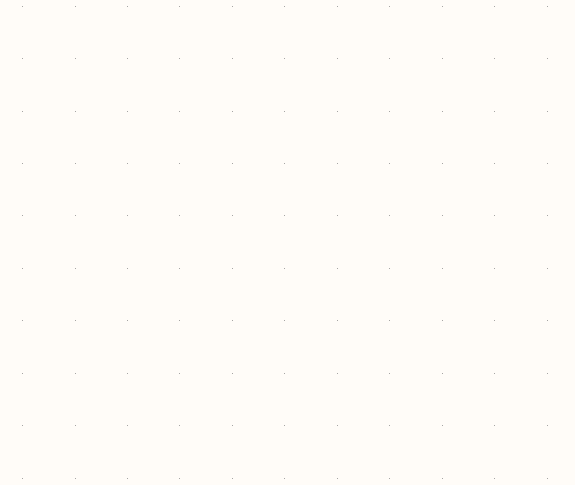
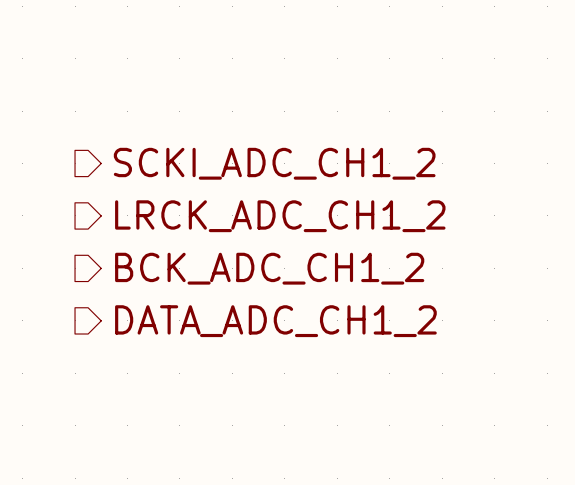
hierarchical label: none -> SCKI_ADC_CH1_2 (274, 163)
hierarchical label: none -> LRCK_ADC_CH1_2 (280, 216)
hierarchical label: none -> BCK_ADC_CH1_2 (269, 268)
hierarchical label: none -> DATA_ADC_CH1_2 (275, 321)

